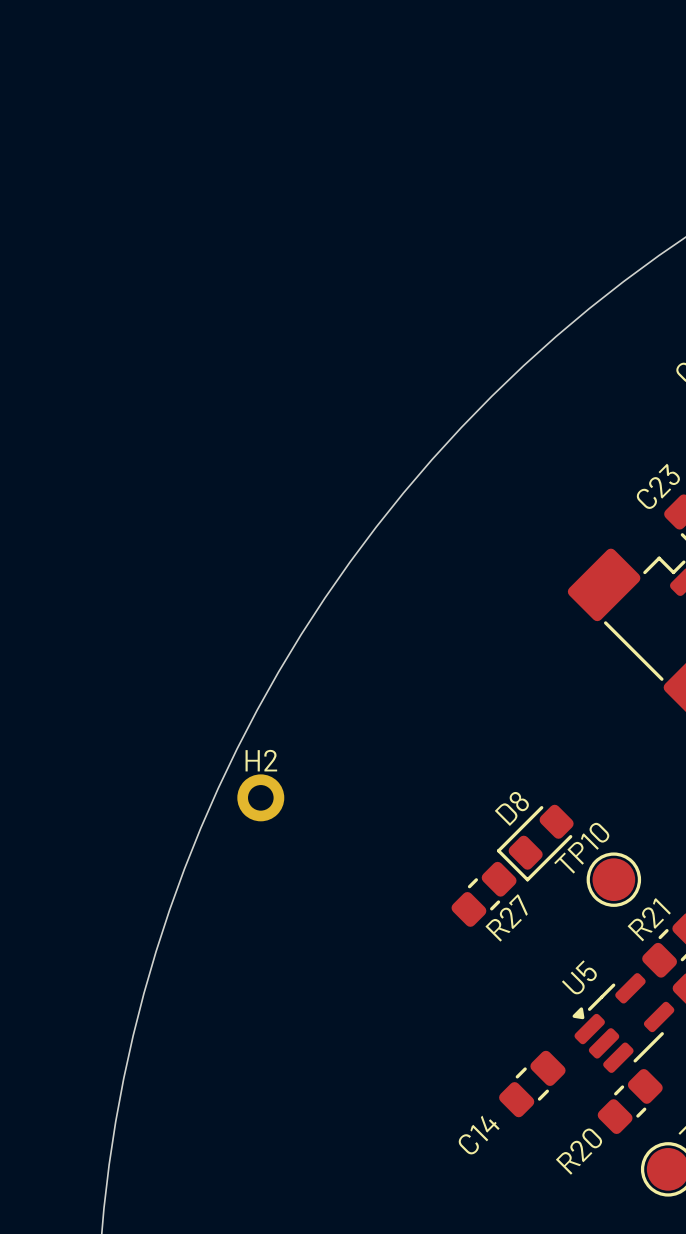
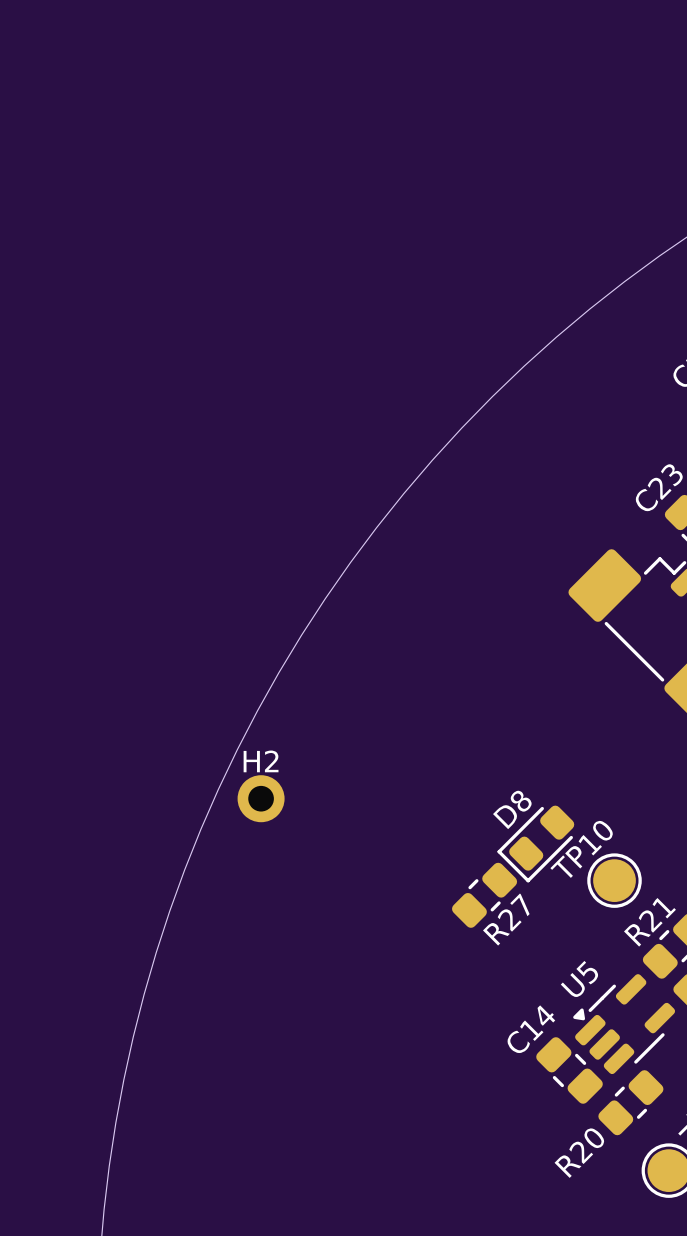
C14 rotation: 0° (532, 1084) -> 90° clockwise (569, 1070)

